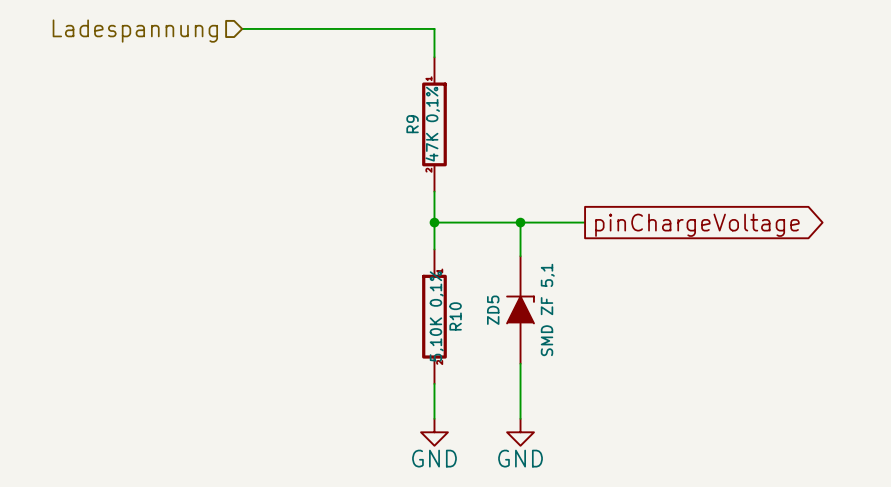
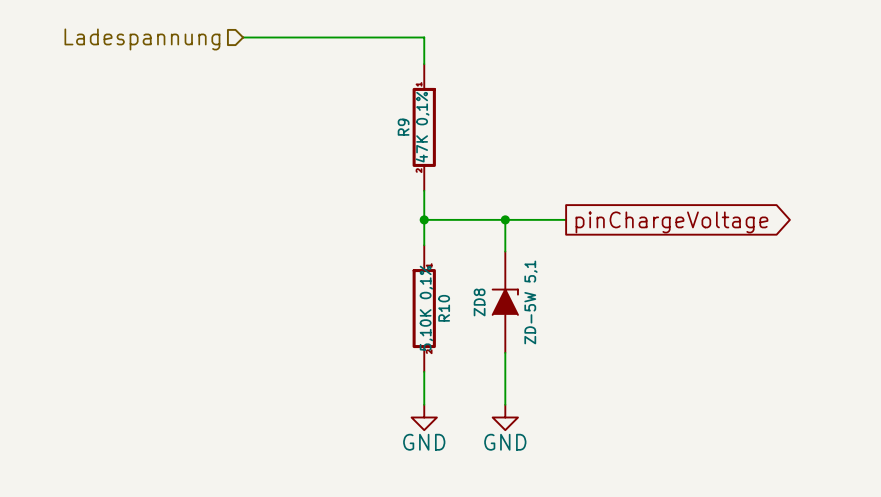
ZD5 value: SMD ZF 5,1 (547, 309) -> ZD-5W 5,1 (530, 302)
ZD5 name: ZD5 (493, 310) -> ZD8 (479, 302)

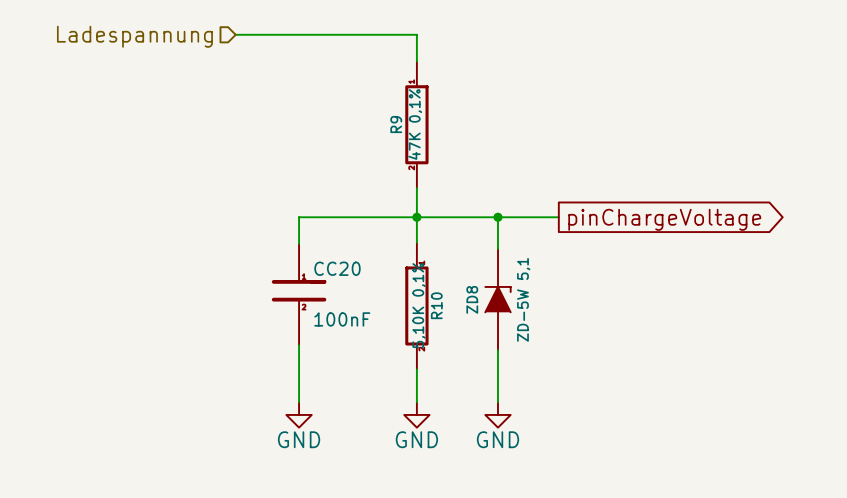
wire: none -> (416, 217) (299, 217) (299, 243)
CC20: none -> 100nF (299, 294)
wire: none -> (299, 345) (299, 402)
power symbol: none -> GND (299, 414)

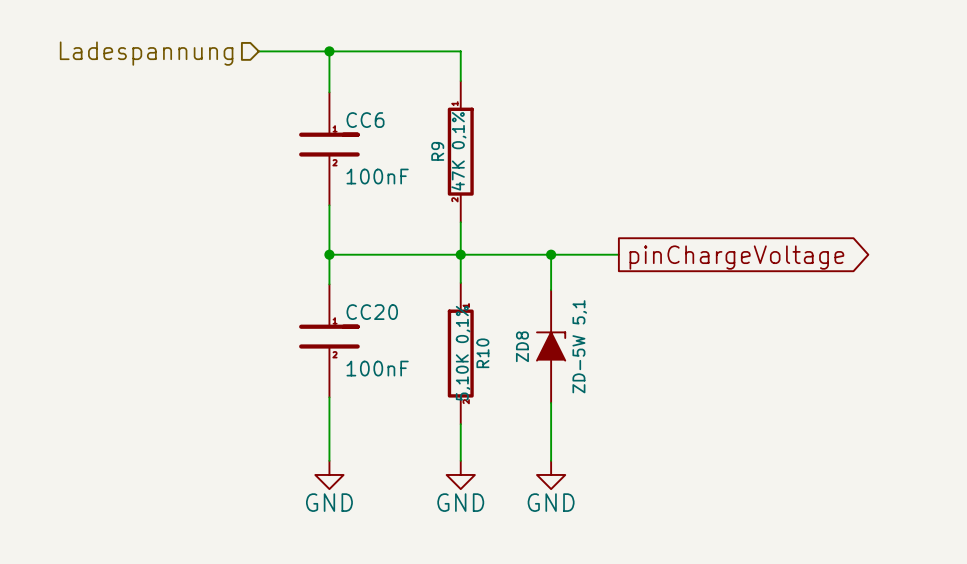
wire: none -> (329, 51) (329, 92)
junction: none -> (329, 51)
CC6: none -> 100nF (329, 148)
wire: none -> (329, 205) (329, 254)
junction: none -> (329, 254)

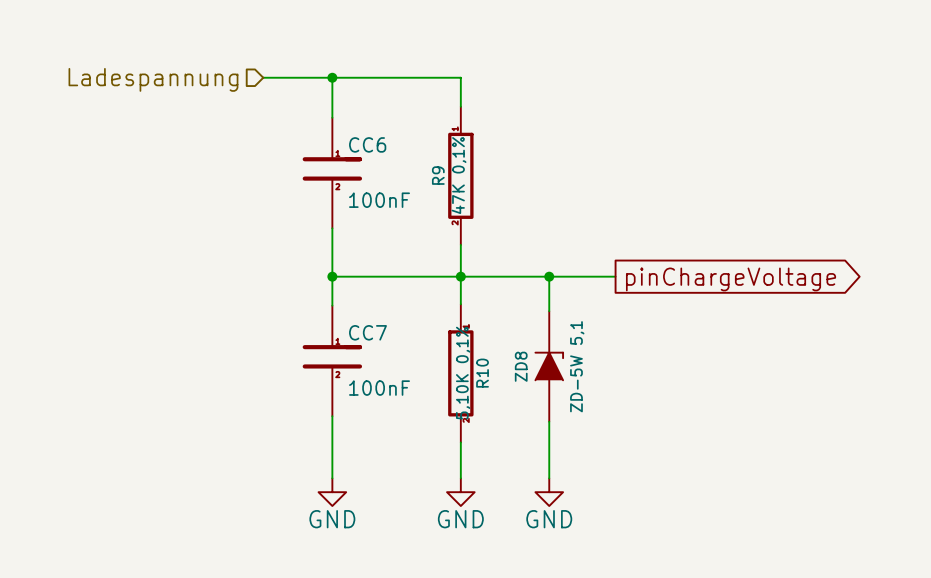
CC20 name: CC20 (372, 312) -> CC7 (367, 332)

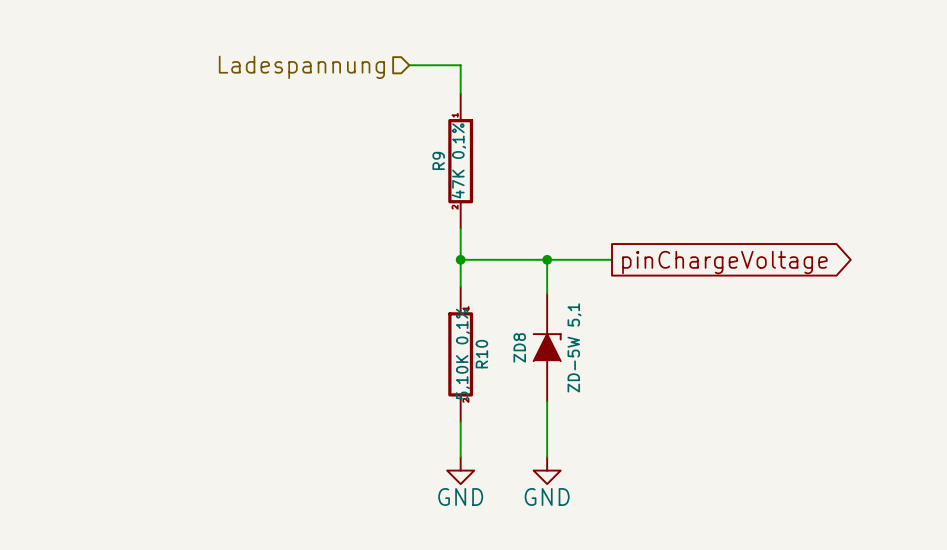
wire: (263, 77) (408, 77) -> none
wire: (332, 77) (332, 117) -> none
junction: (332, 77) -> none
hierarchical label position: Ladespannung (153, 79) -> Ladespannung (301, 67)
CC6: 100nF (332, 173) -> none
wire: (332, 228) (332, 305) -> none
wire: (332, 276) (460, 276) -> none
junction: (332, 276) -> none
CC7: 100nF (332, 360) -> none
wire: (332, 416) (332, 478) -> none
power symbol: GND (332, 492) -> none

